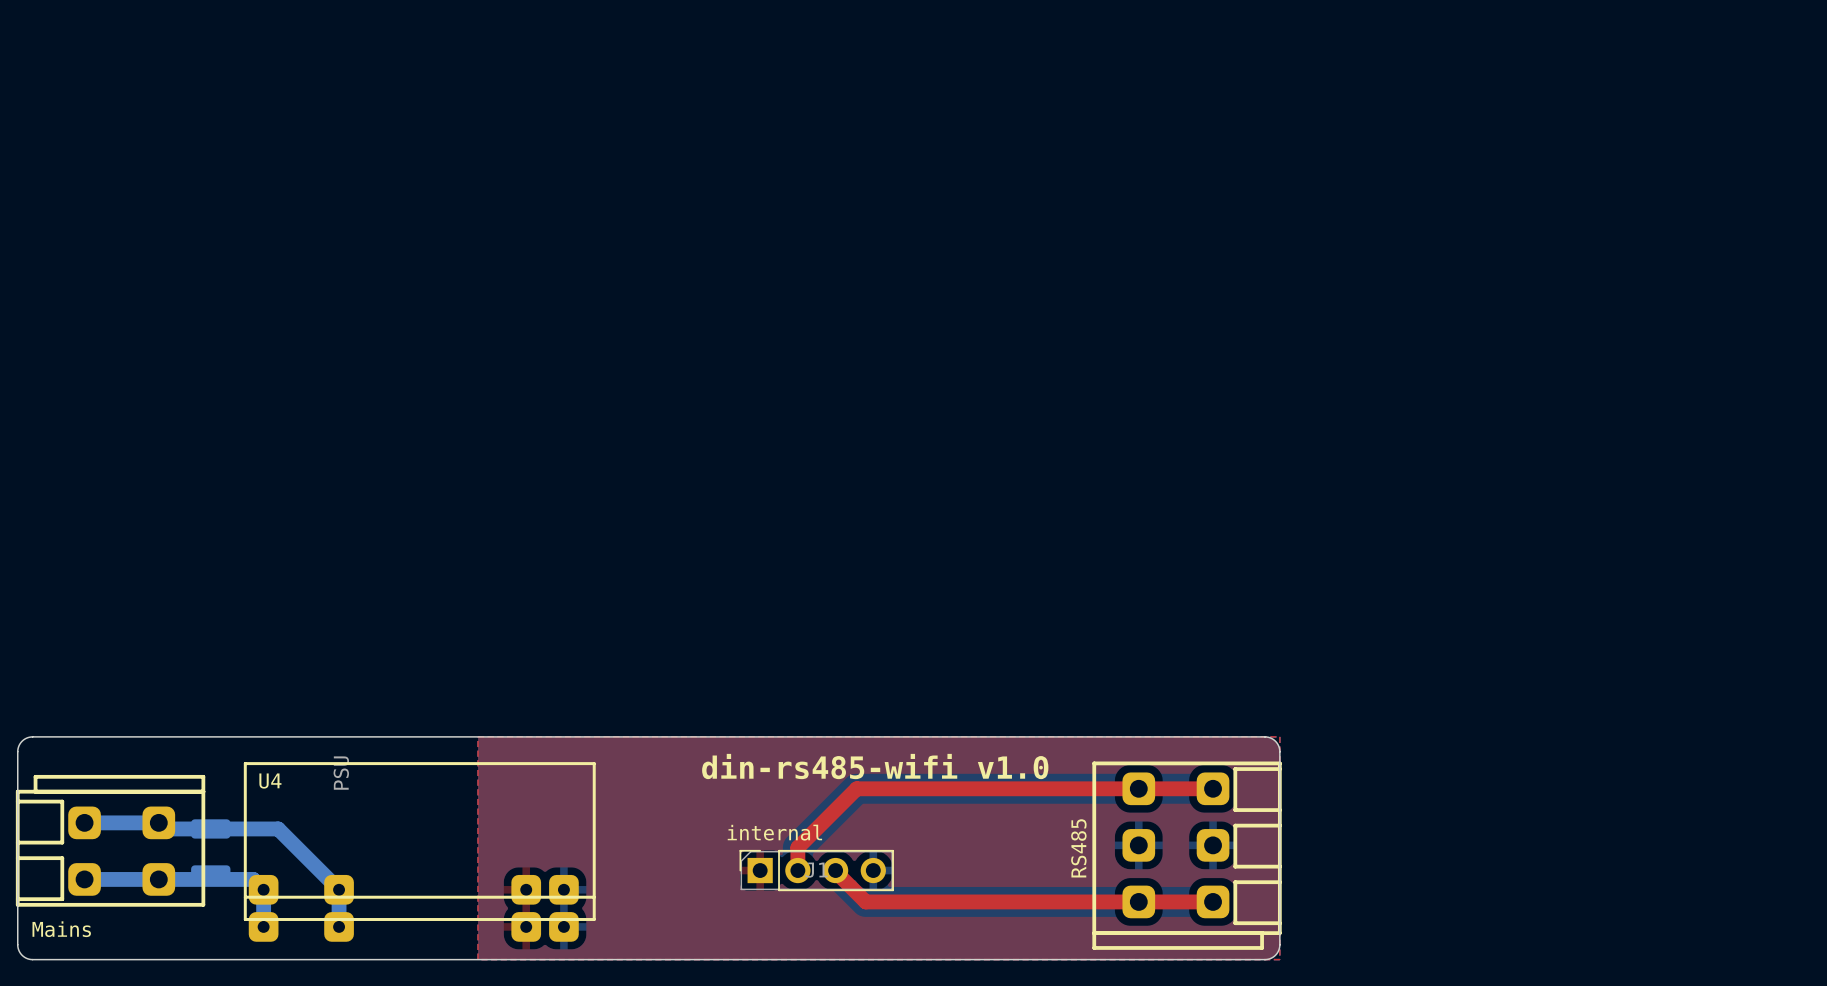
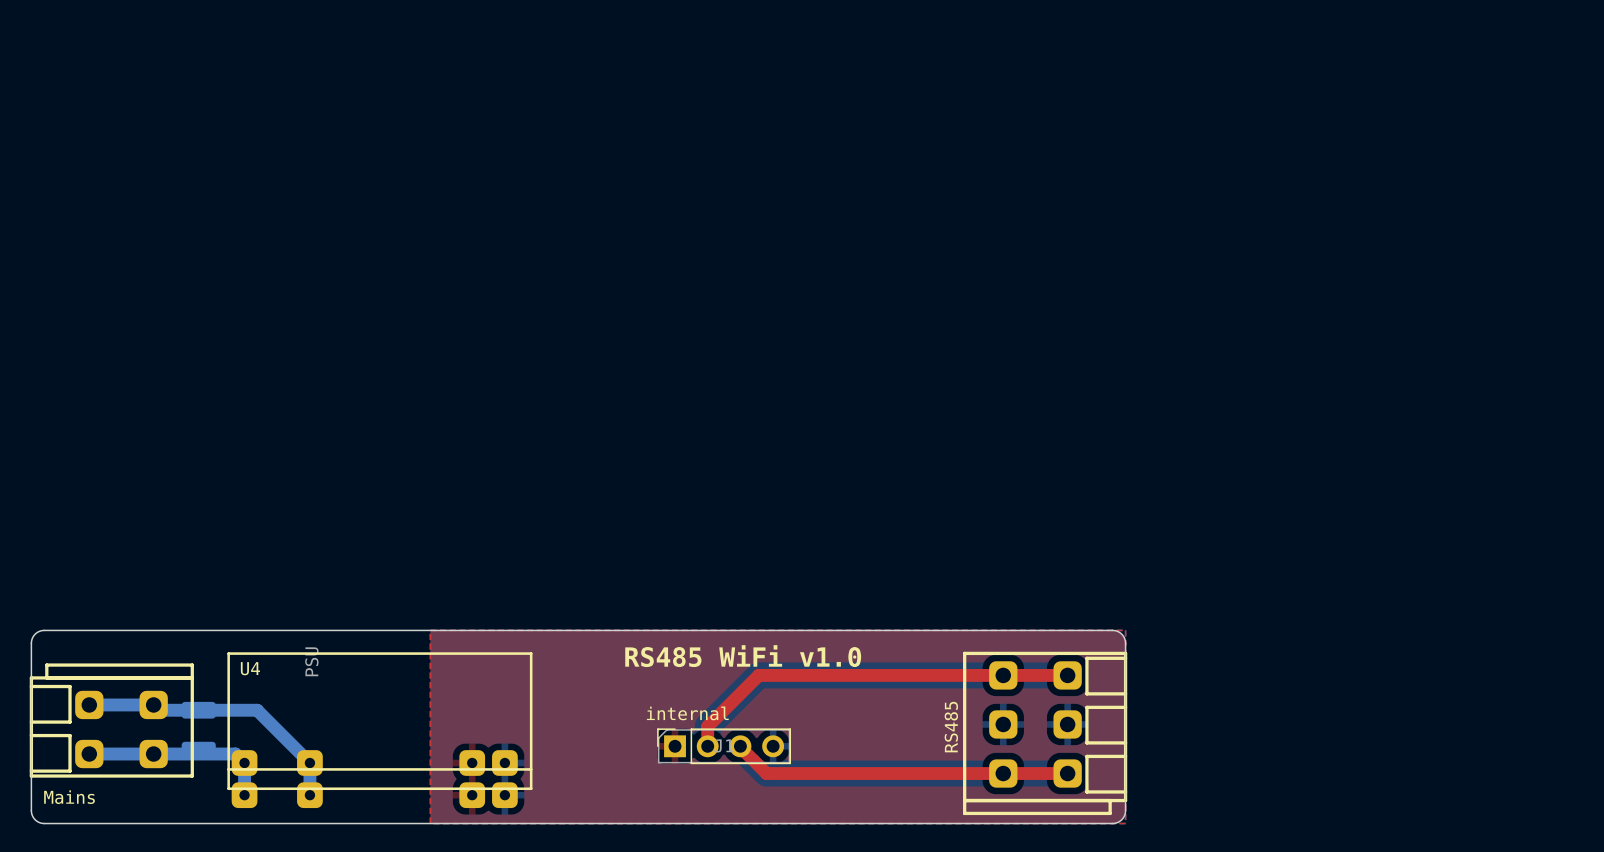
text: din-rs485-wifi v1.0 (875, 766) -> RS485 WiFi v1.0 (743, 656)

